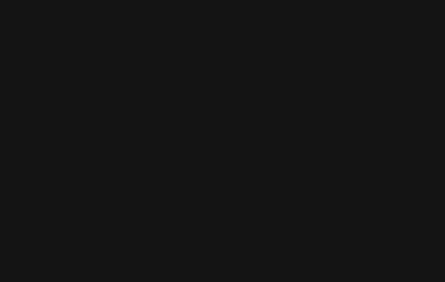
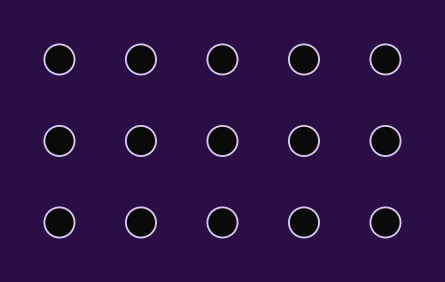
part: none -> (59, 59)
part: none -> (140, 59)
part: none -> (222, 59)
part: none -> (303, 59)
part: none -> (385, 59)
part: none -> (59, 140)
part: none -> (140, 140)
part: none -> (222, 140)
part: none -> (303, 140)
part: none -> (385, 140)
part: none -> (59, 222)
part: none -> (140, 222)
part: none -> (222, 222)
part: none -> (303, 222)
part: none -> (385, 222)

